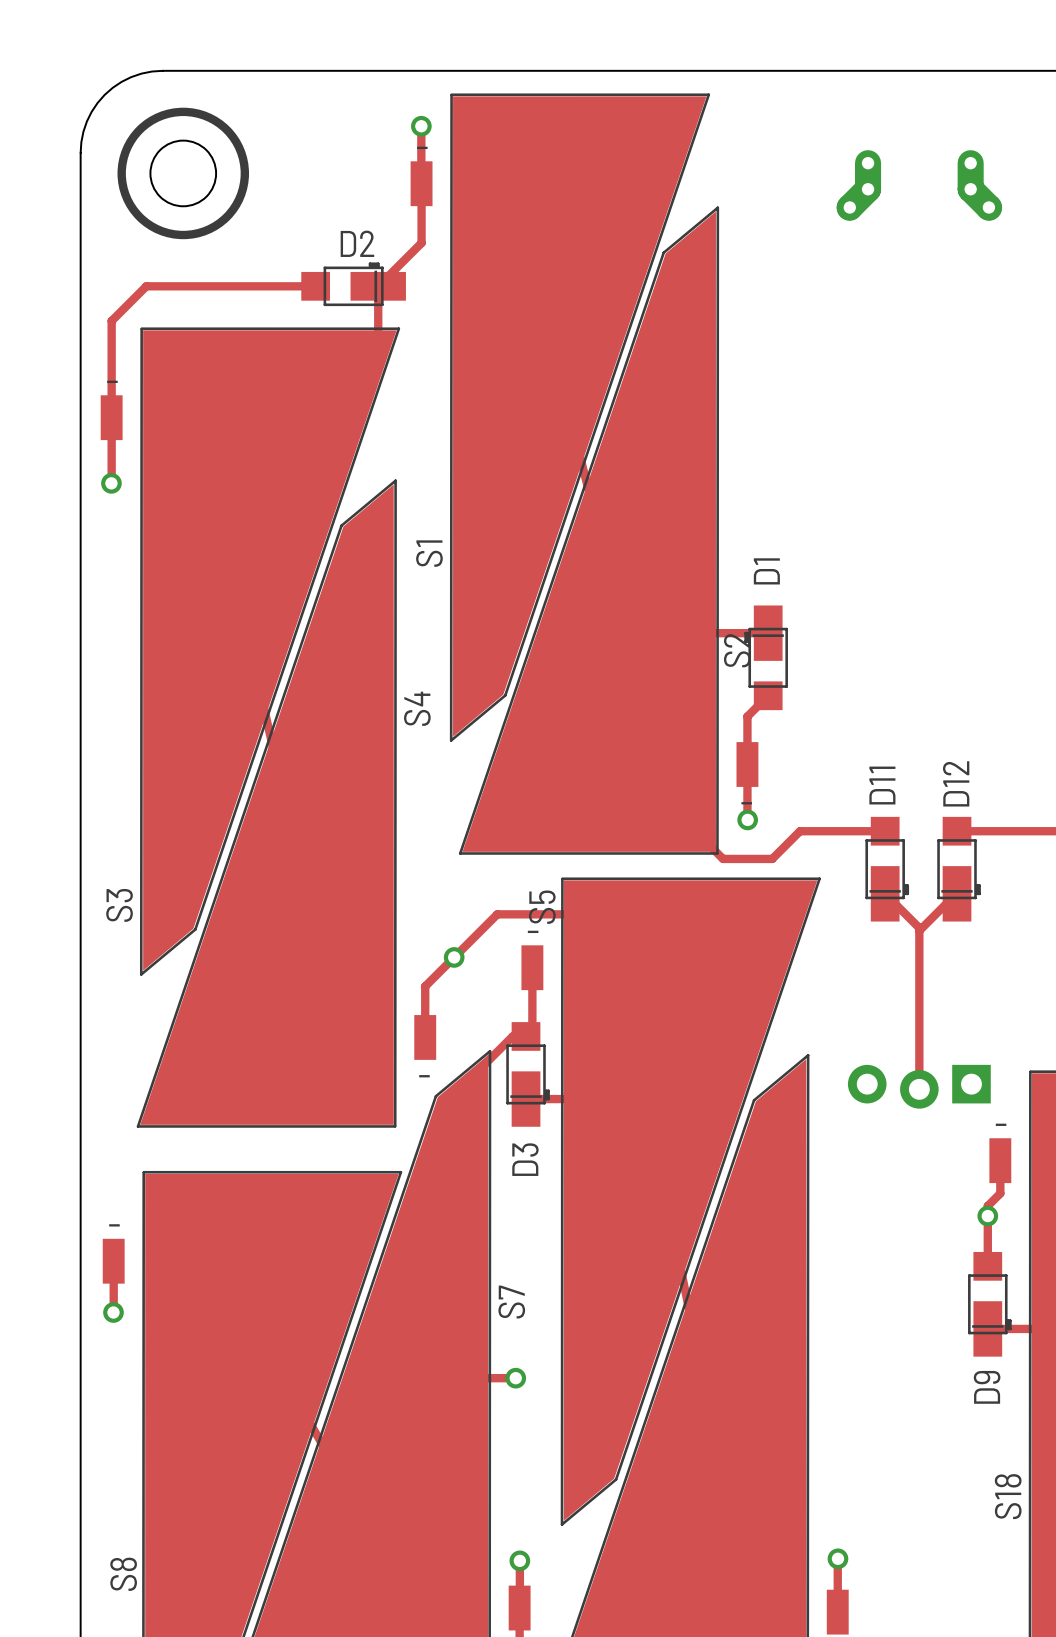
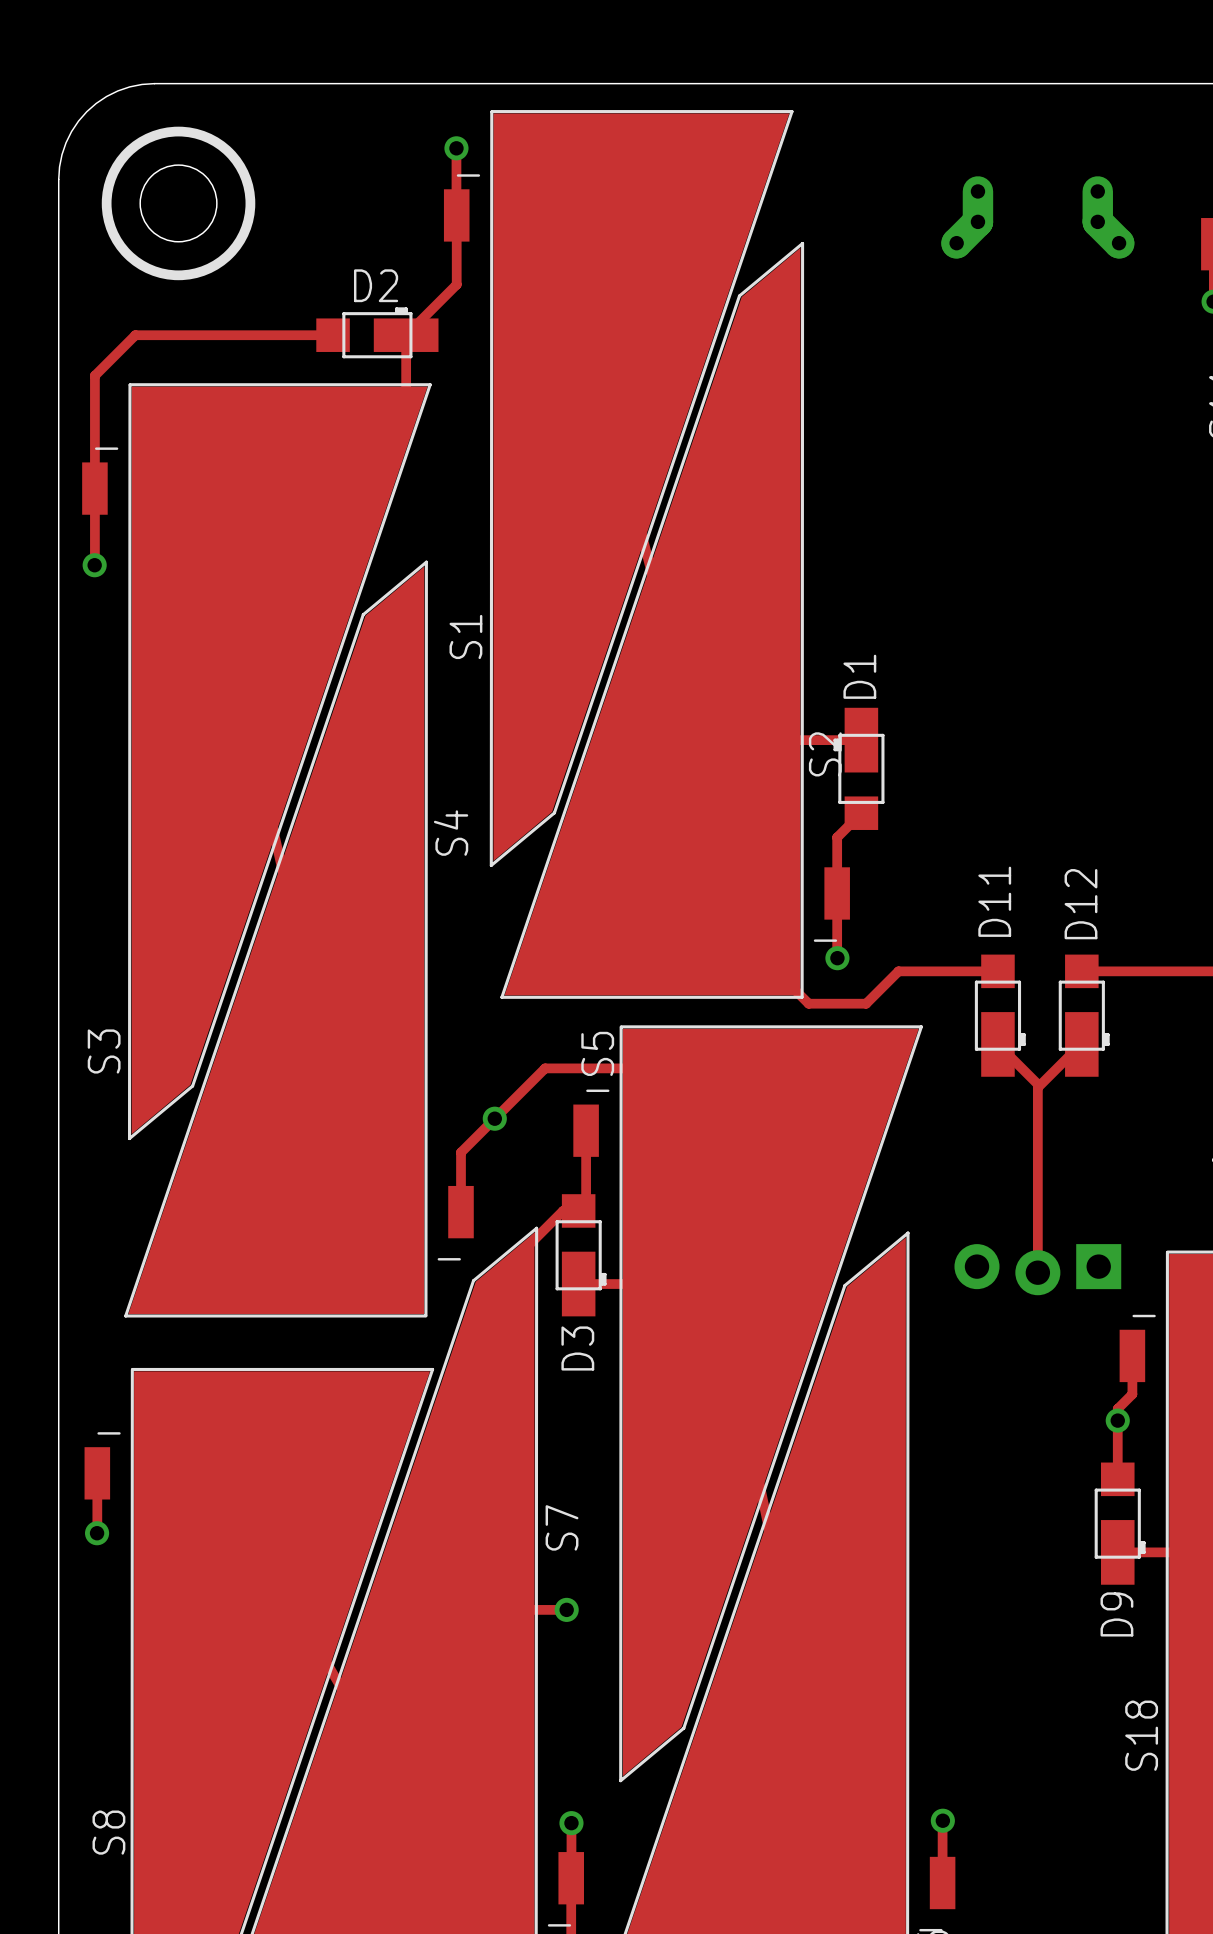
D2 footprint: [301, 262, 406, 307] -> [316, 307, 439, 359]
D1 footprint: [744, 605, 788, 711] -> [833, 707, 885, 830]
D11 footprint: [865, 816, 910, 922] -> [974, 954, 1026, 1077]
D12 footprint: [937, 816, 981, 922] -> [1058, 954, 1110, 1077]
D3 footprint: [506, 1022, 550, 1127] -> [555, 1194, 607, 1317]
D9 footprint: [968, 1251, 1012, 1357] -> [1094, 1462, 1146, 1585]

